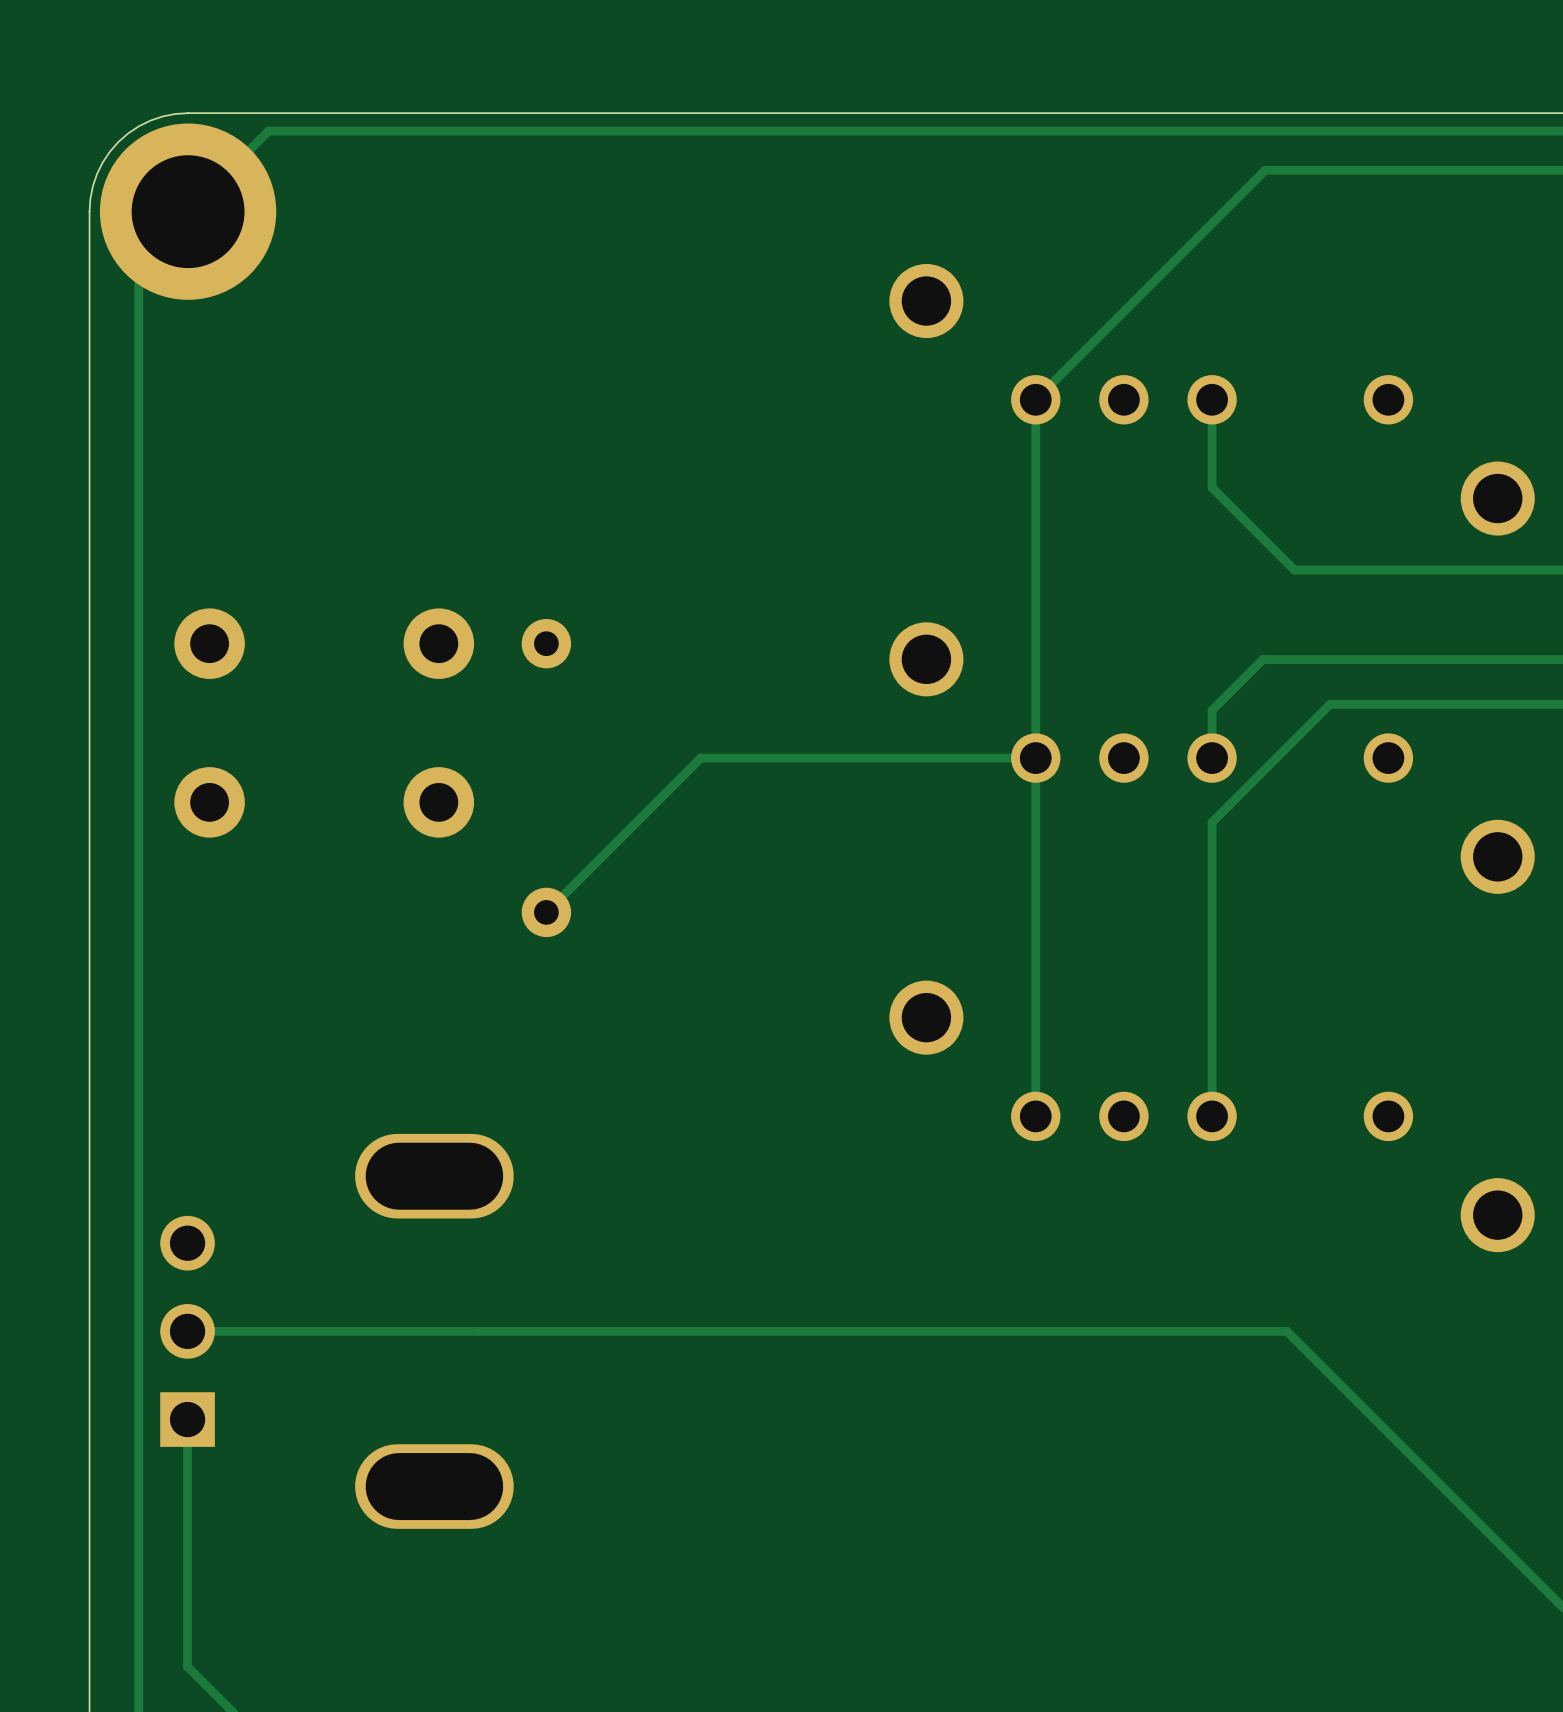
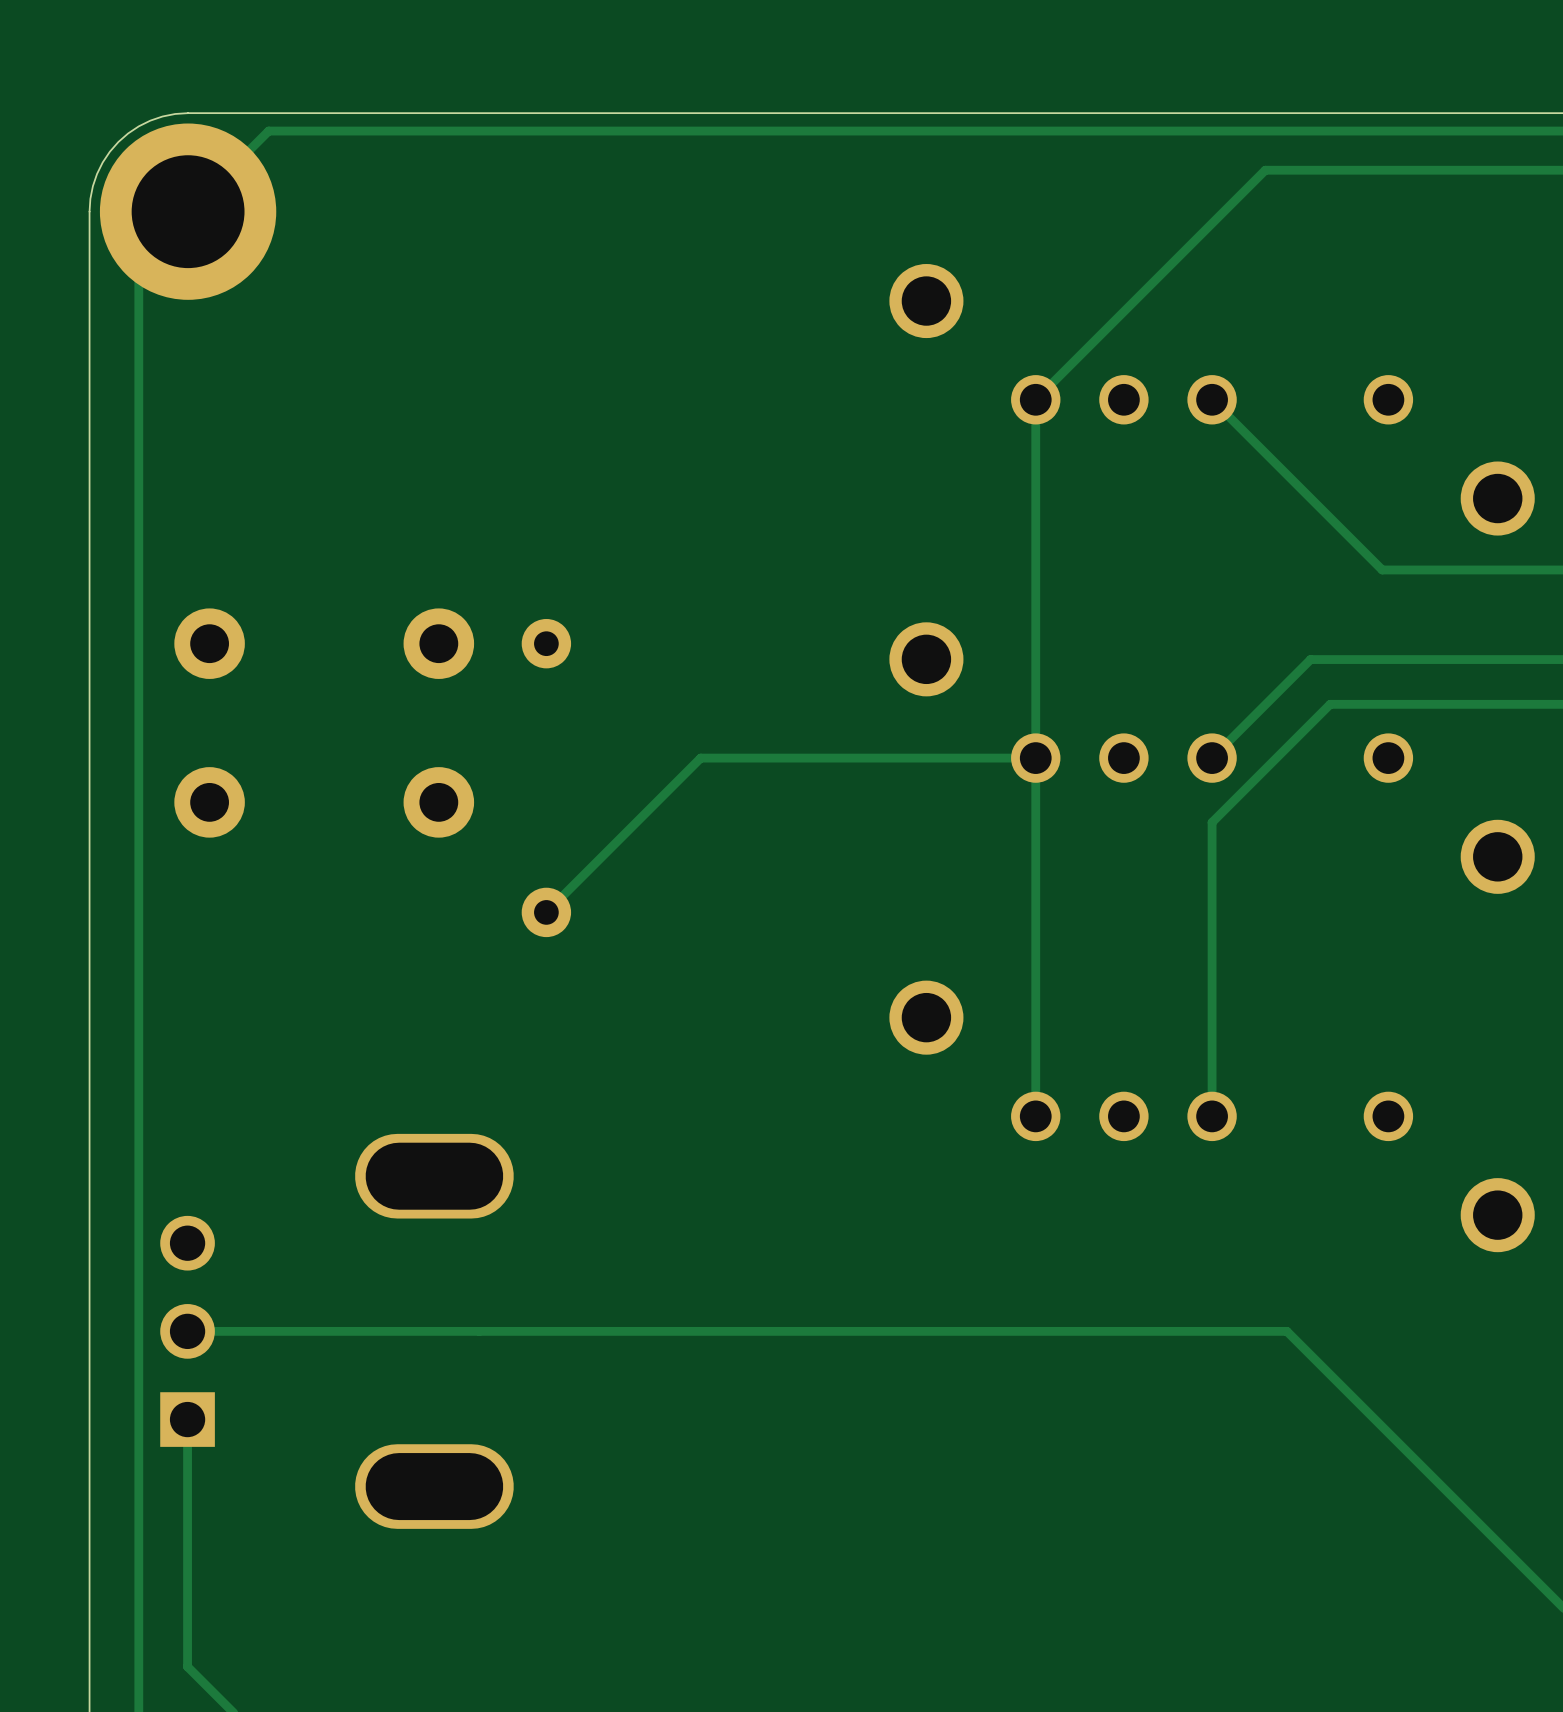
track: (1212, 399) (1212, 487) (1294, 569) (1382, 569) -> (1212, 399) (1382, 569)
track: (1310, 659) (1263, 659) (1212, 710) (1212, 758) -> (1310, 659) (1212, 758)

